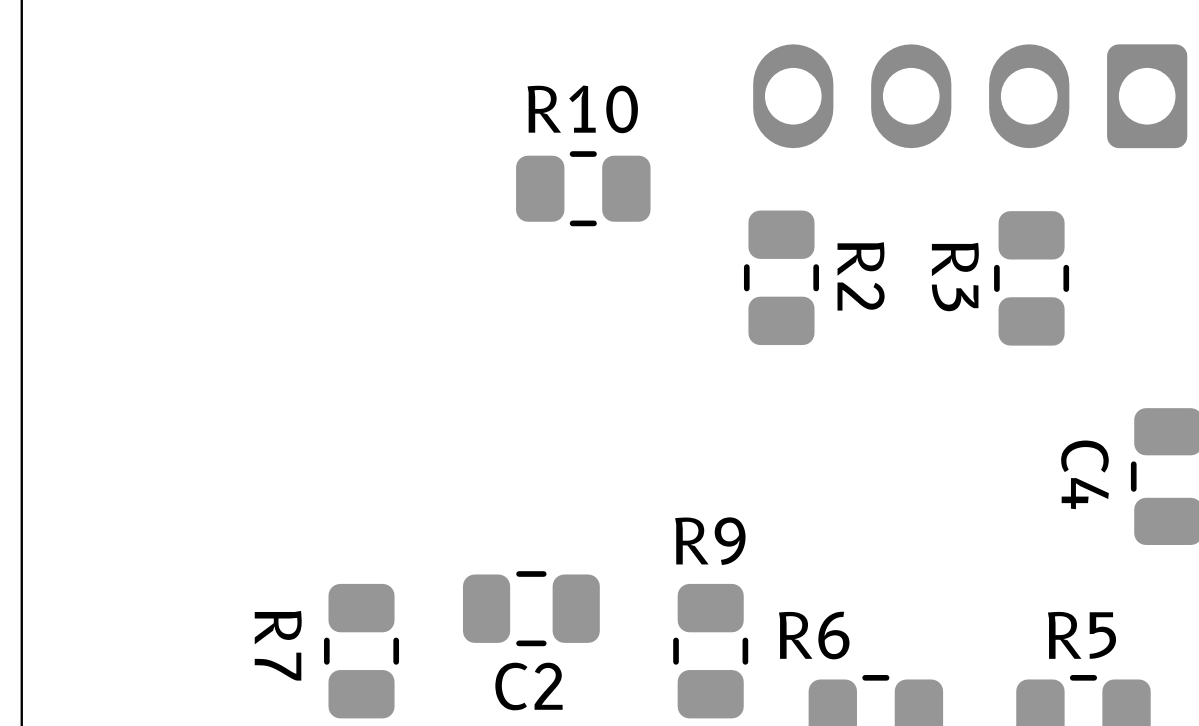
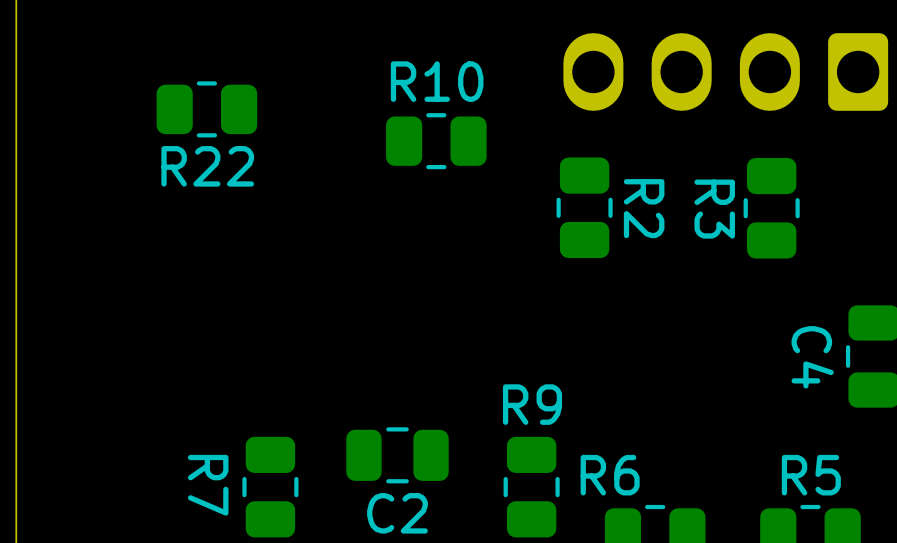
R22: none -> (206, 109)

